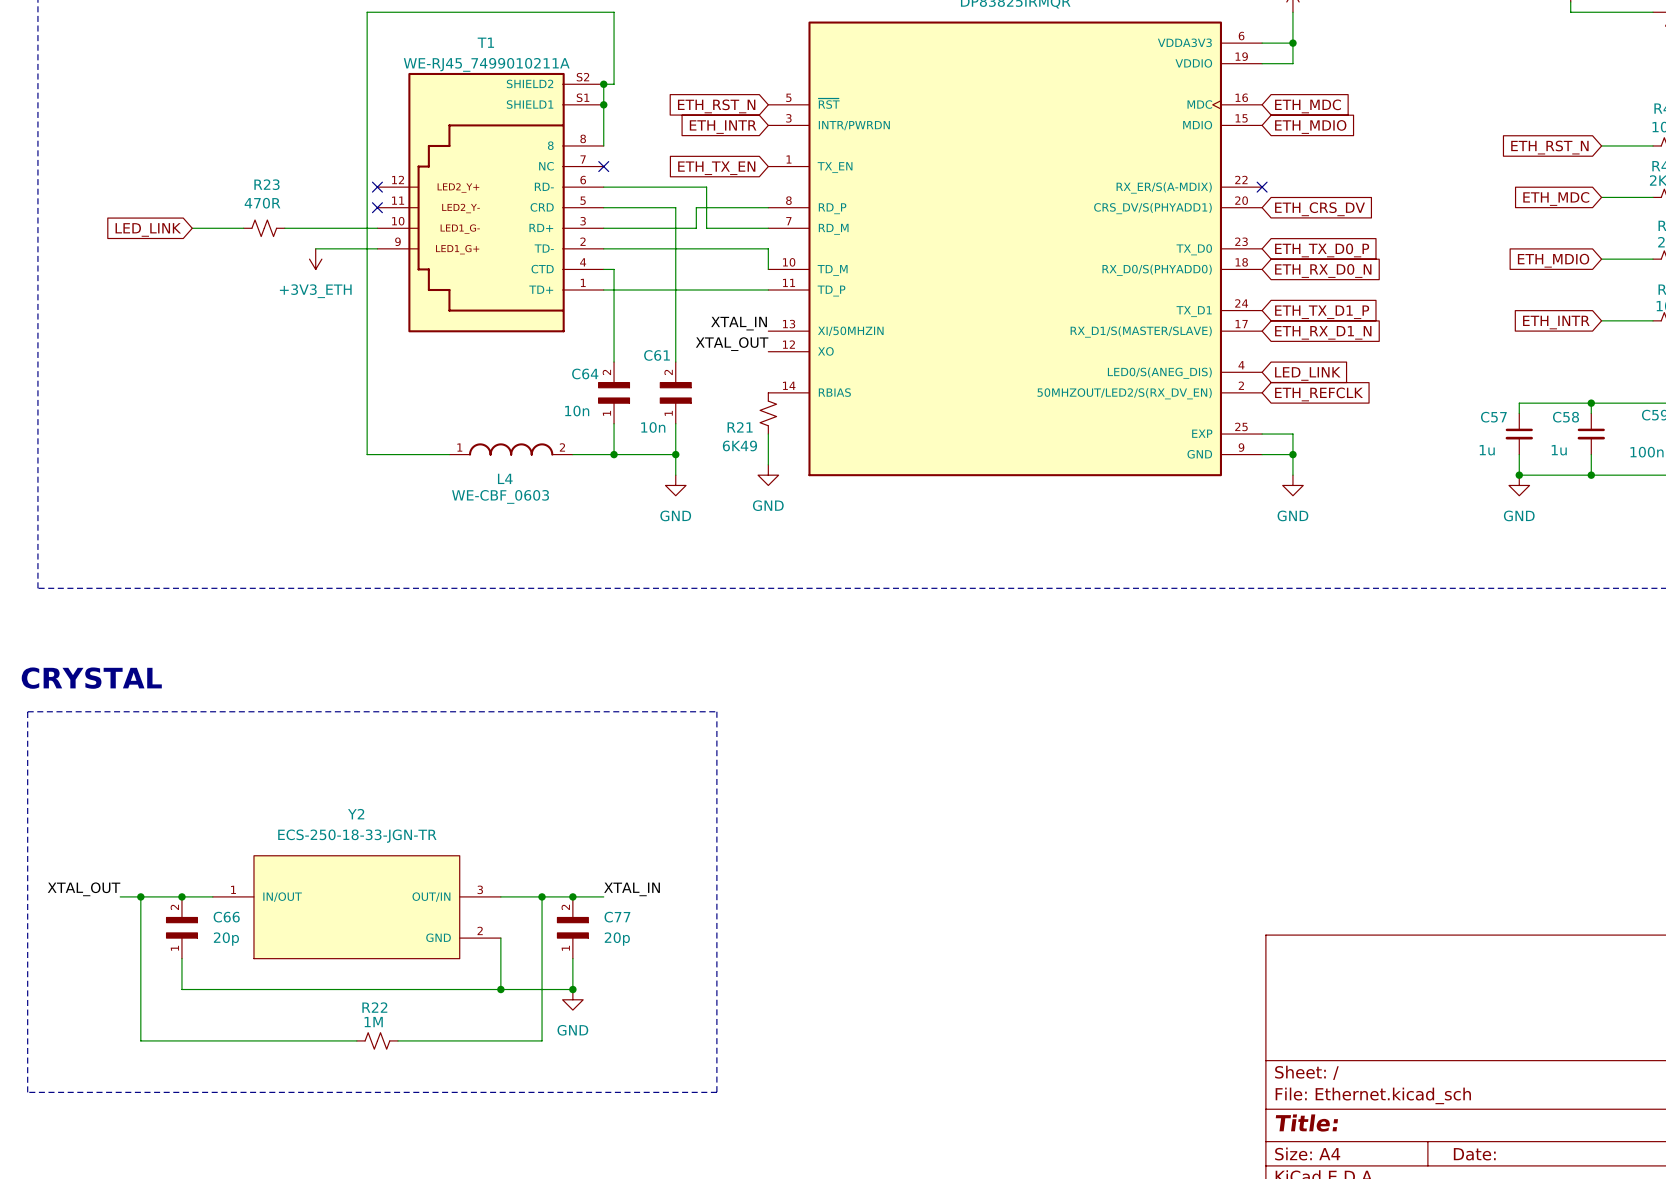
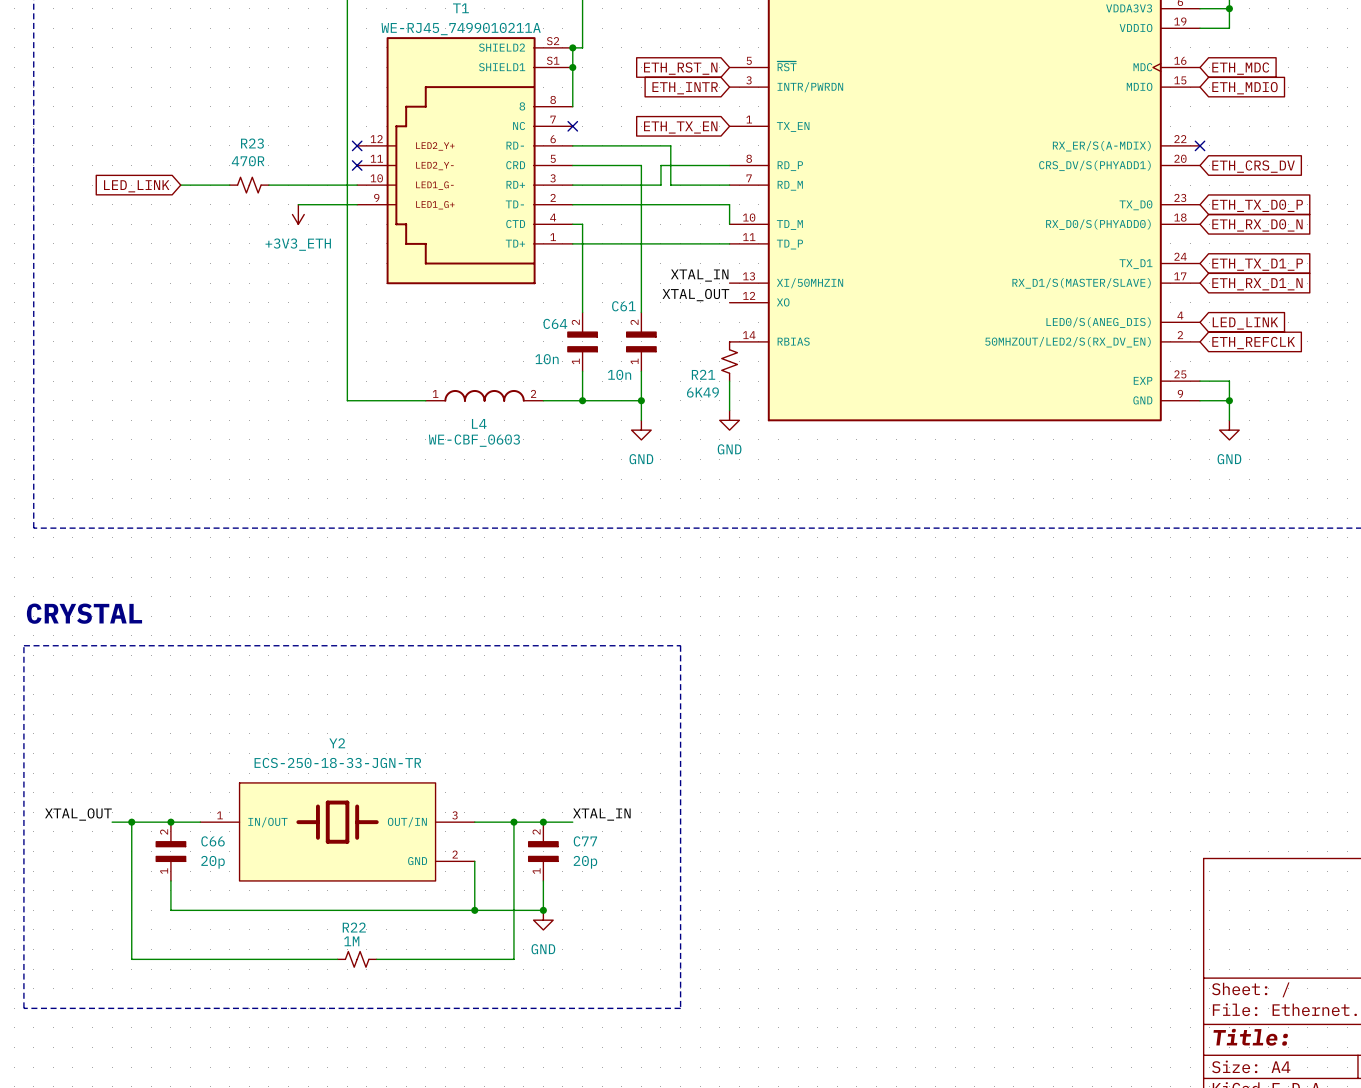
Y2 symbol: [212, 855, 501, 960] -> [200, 782, 475, 882]

